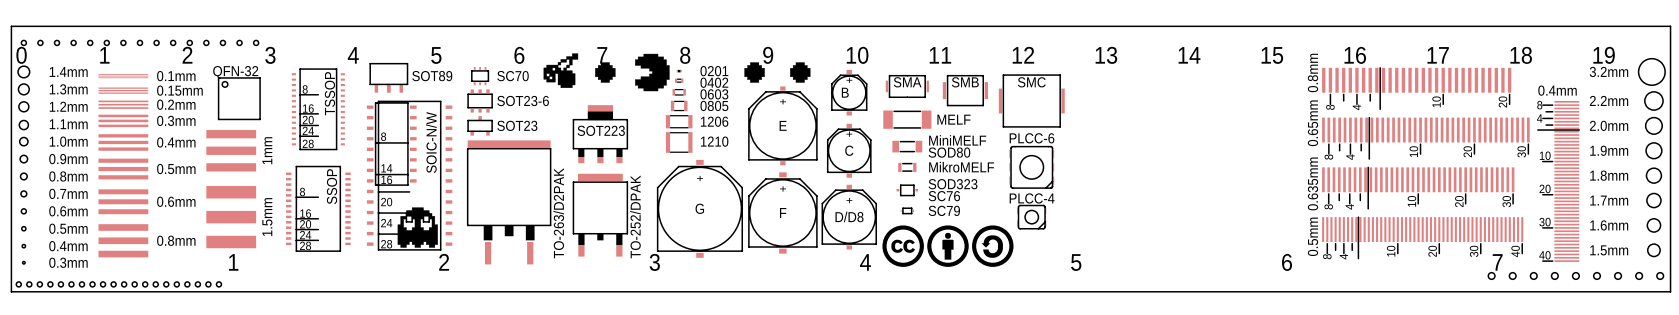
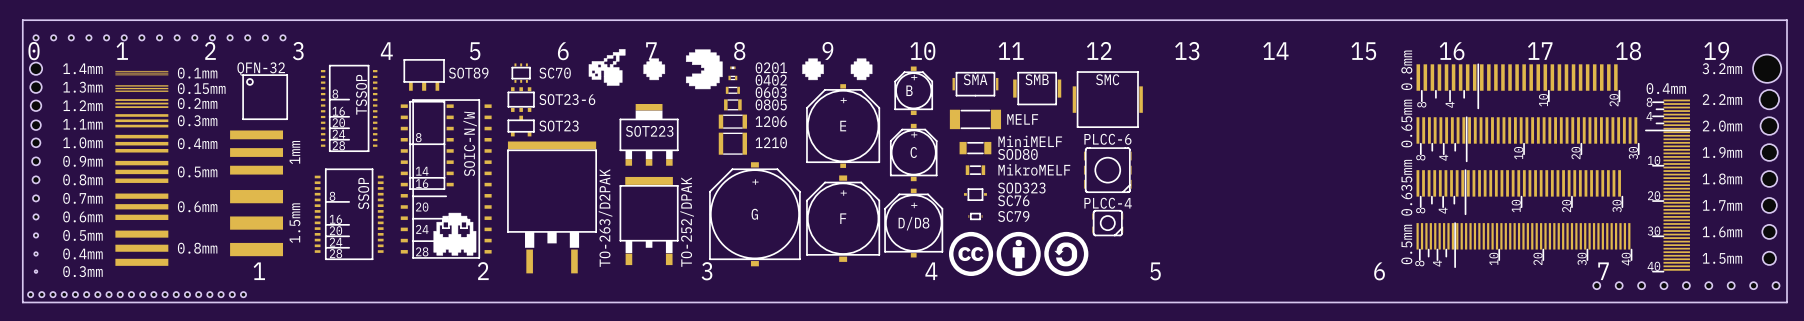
part footprint: [1322, 67, 1512, 110] -> [1416, 63, 1620, 110]
part footprint: [291, 68, 345, 151] -> [320, 64, 378, 152]
part footprint: [1537, 100, 1580, 262] -> [1645, 99, 1691, 273]
part footprint: [1322, 116, 1530, 160] -> [1416, 116, 1640, 163]
part footprint: [1322, 166, 1515, 210] -> [1416, 169, 1623, 215]
part footprint: [1322, 216, 1524, 260] -> [1416, 222, 1632, 268]

